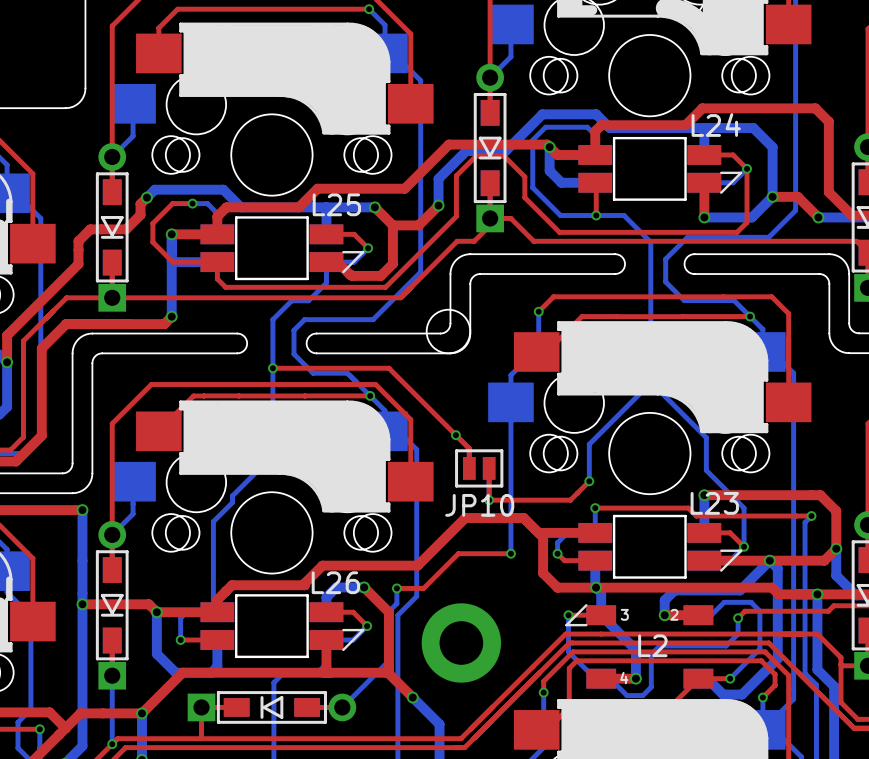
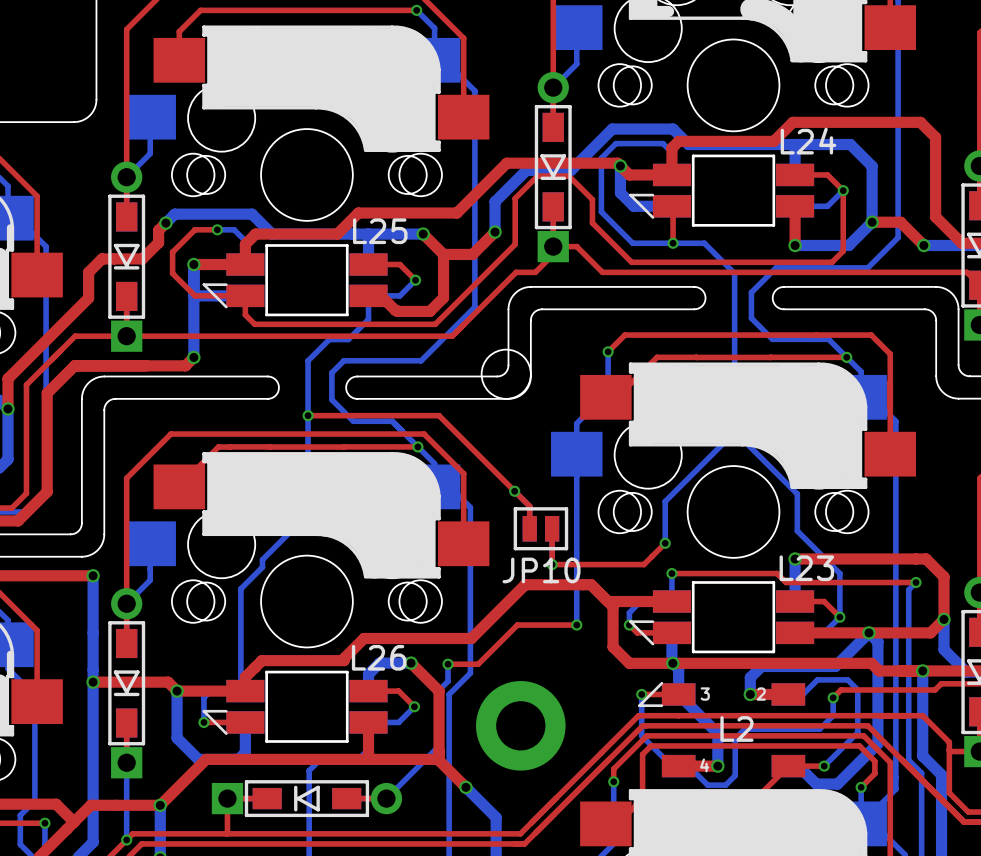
L24 footprint: [578, 136, 743, 201] -> [629, 154, 815, 227]
L25 footprint: [200, 216, 365, 281] -> [202, 244, 388, 317]
L23 footprint: [578, 514, 743, 579] -> [629, 581, 815, 654]
L26 footprint: [200, 594, 365, 659] -> [202, 670, 388, 743]

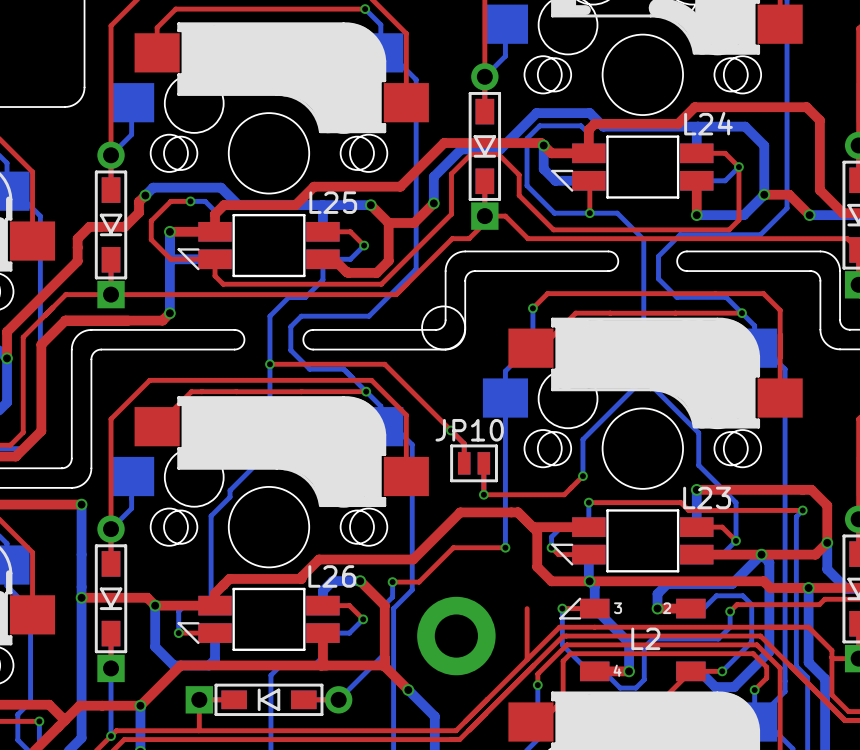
part text position: JP10 (541, 570) -> JP10 (469, 430)
top track: none -> (527, 608) (527, 659)

